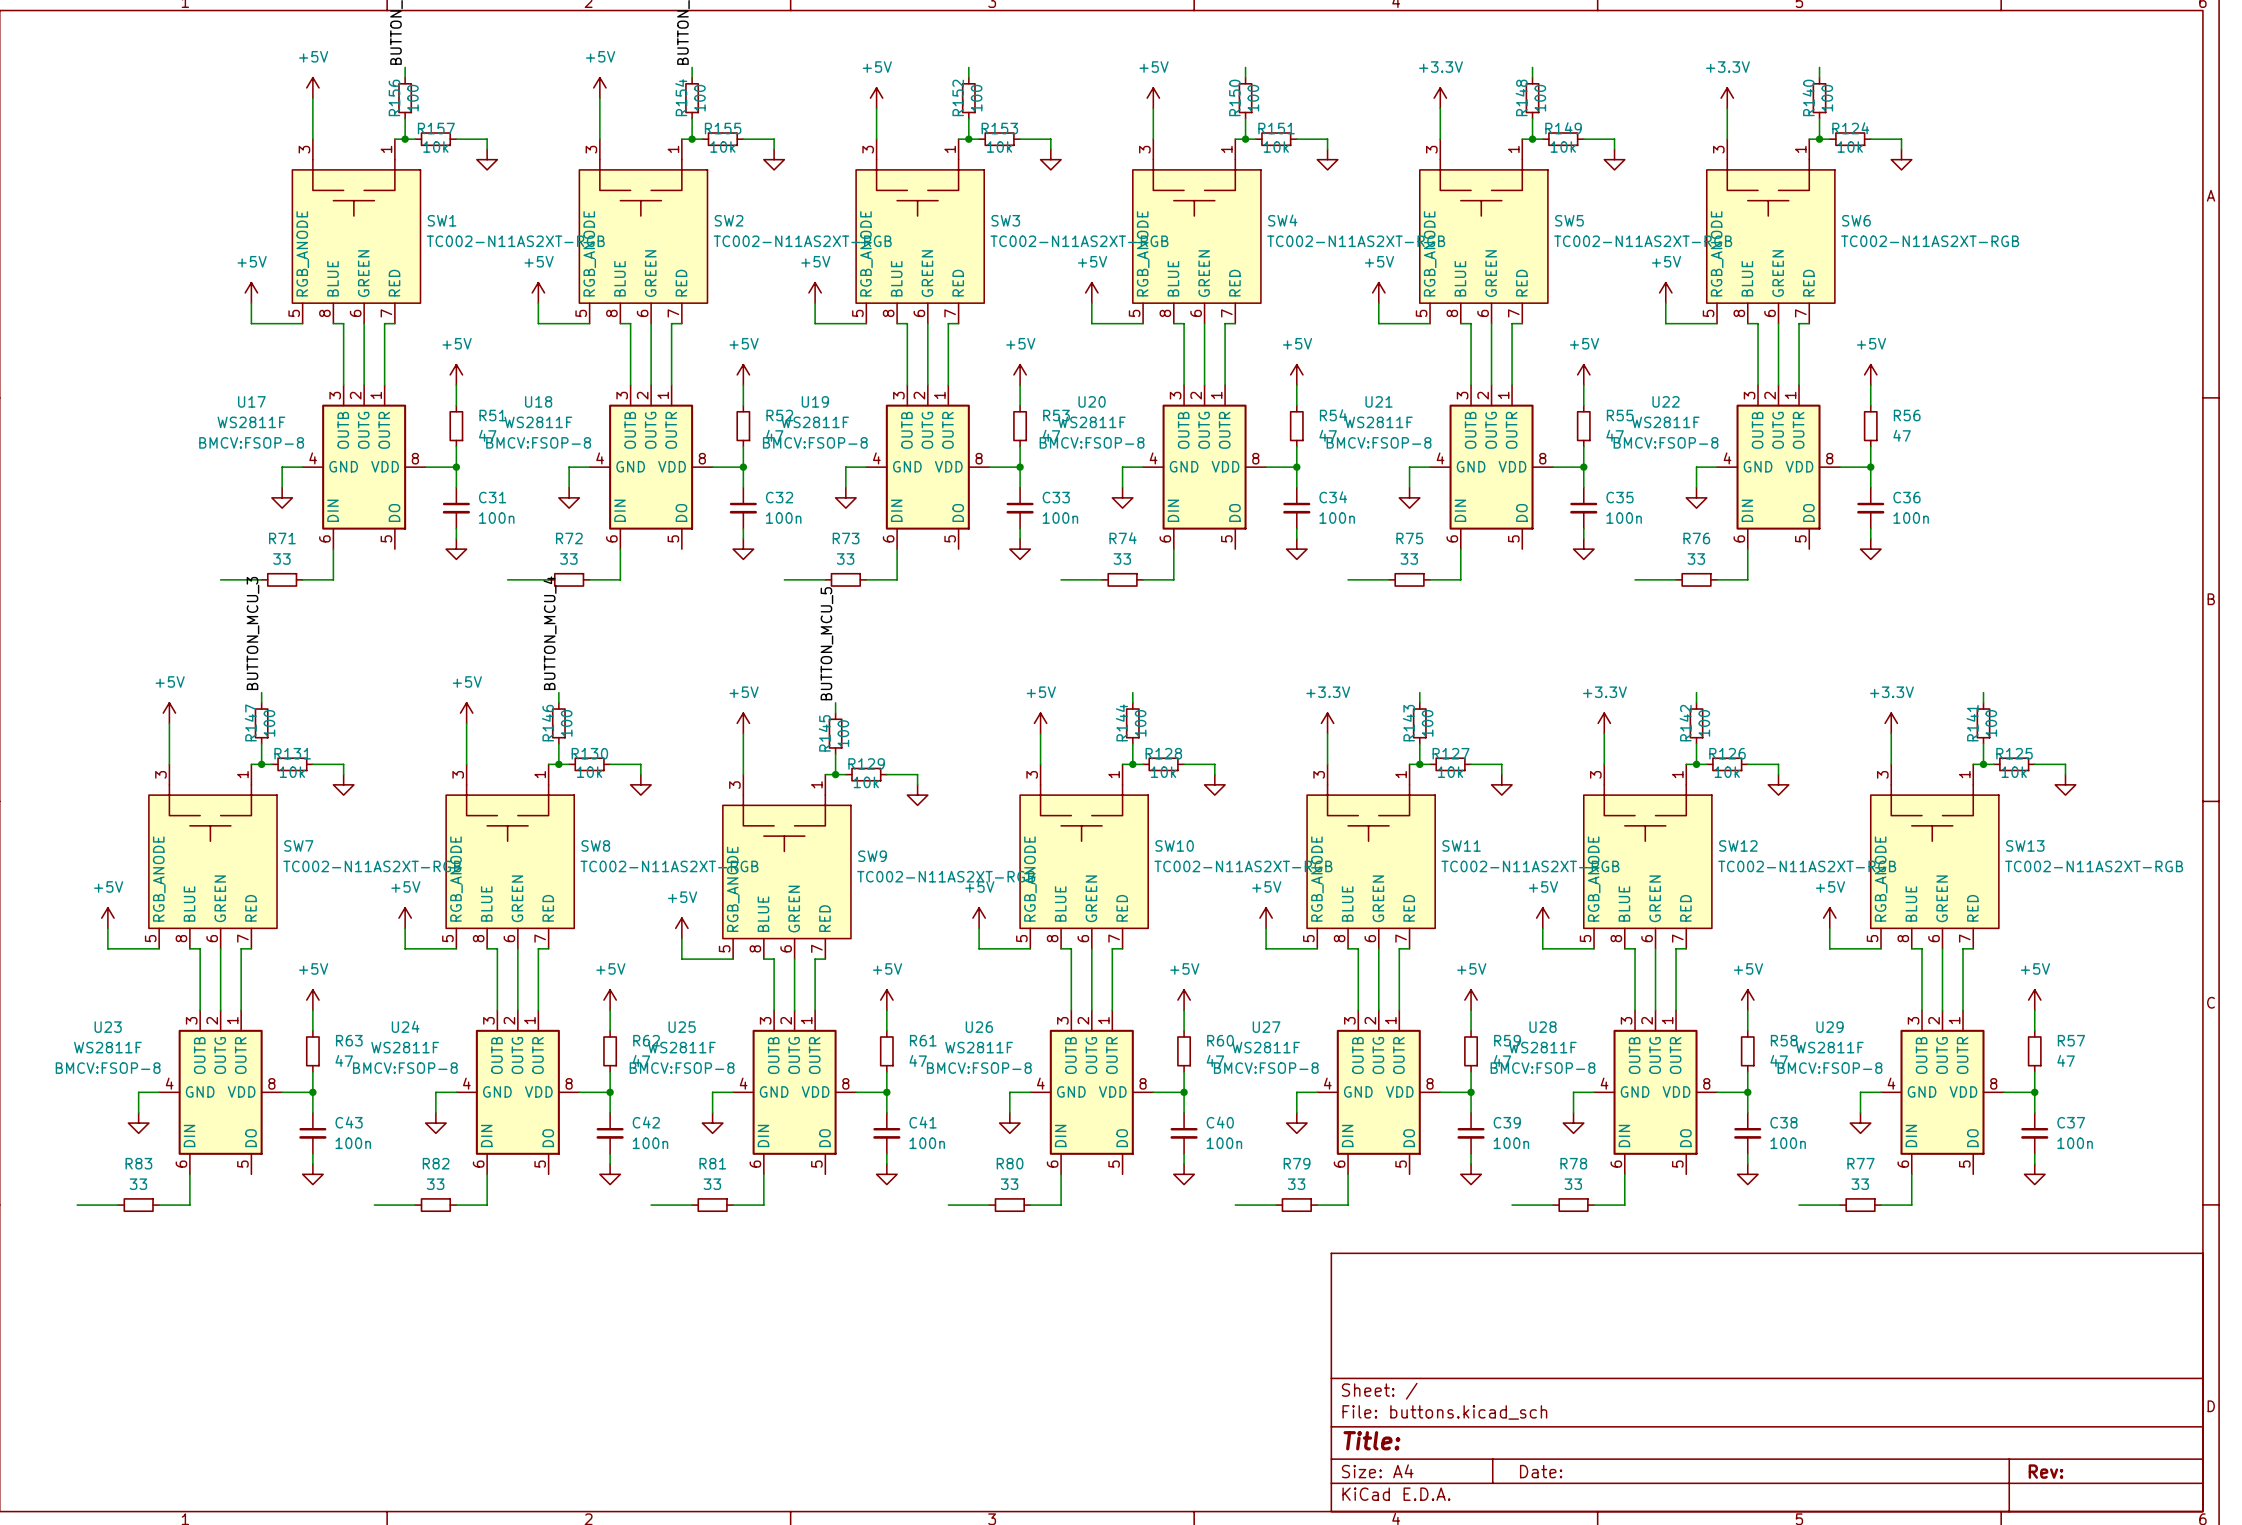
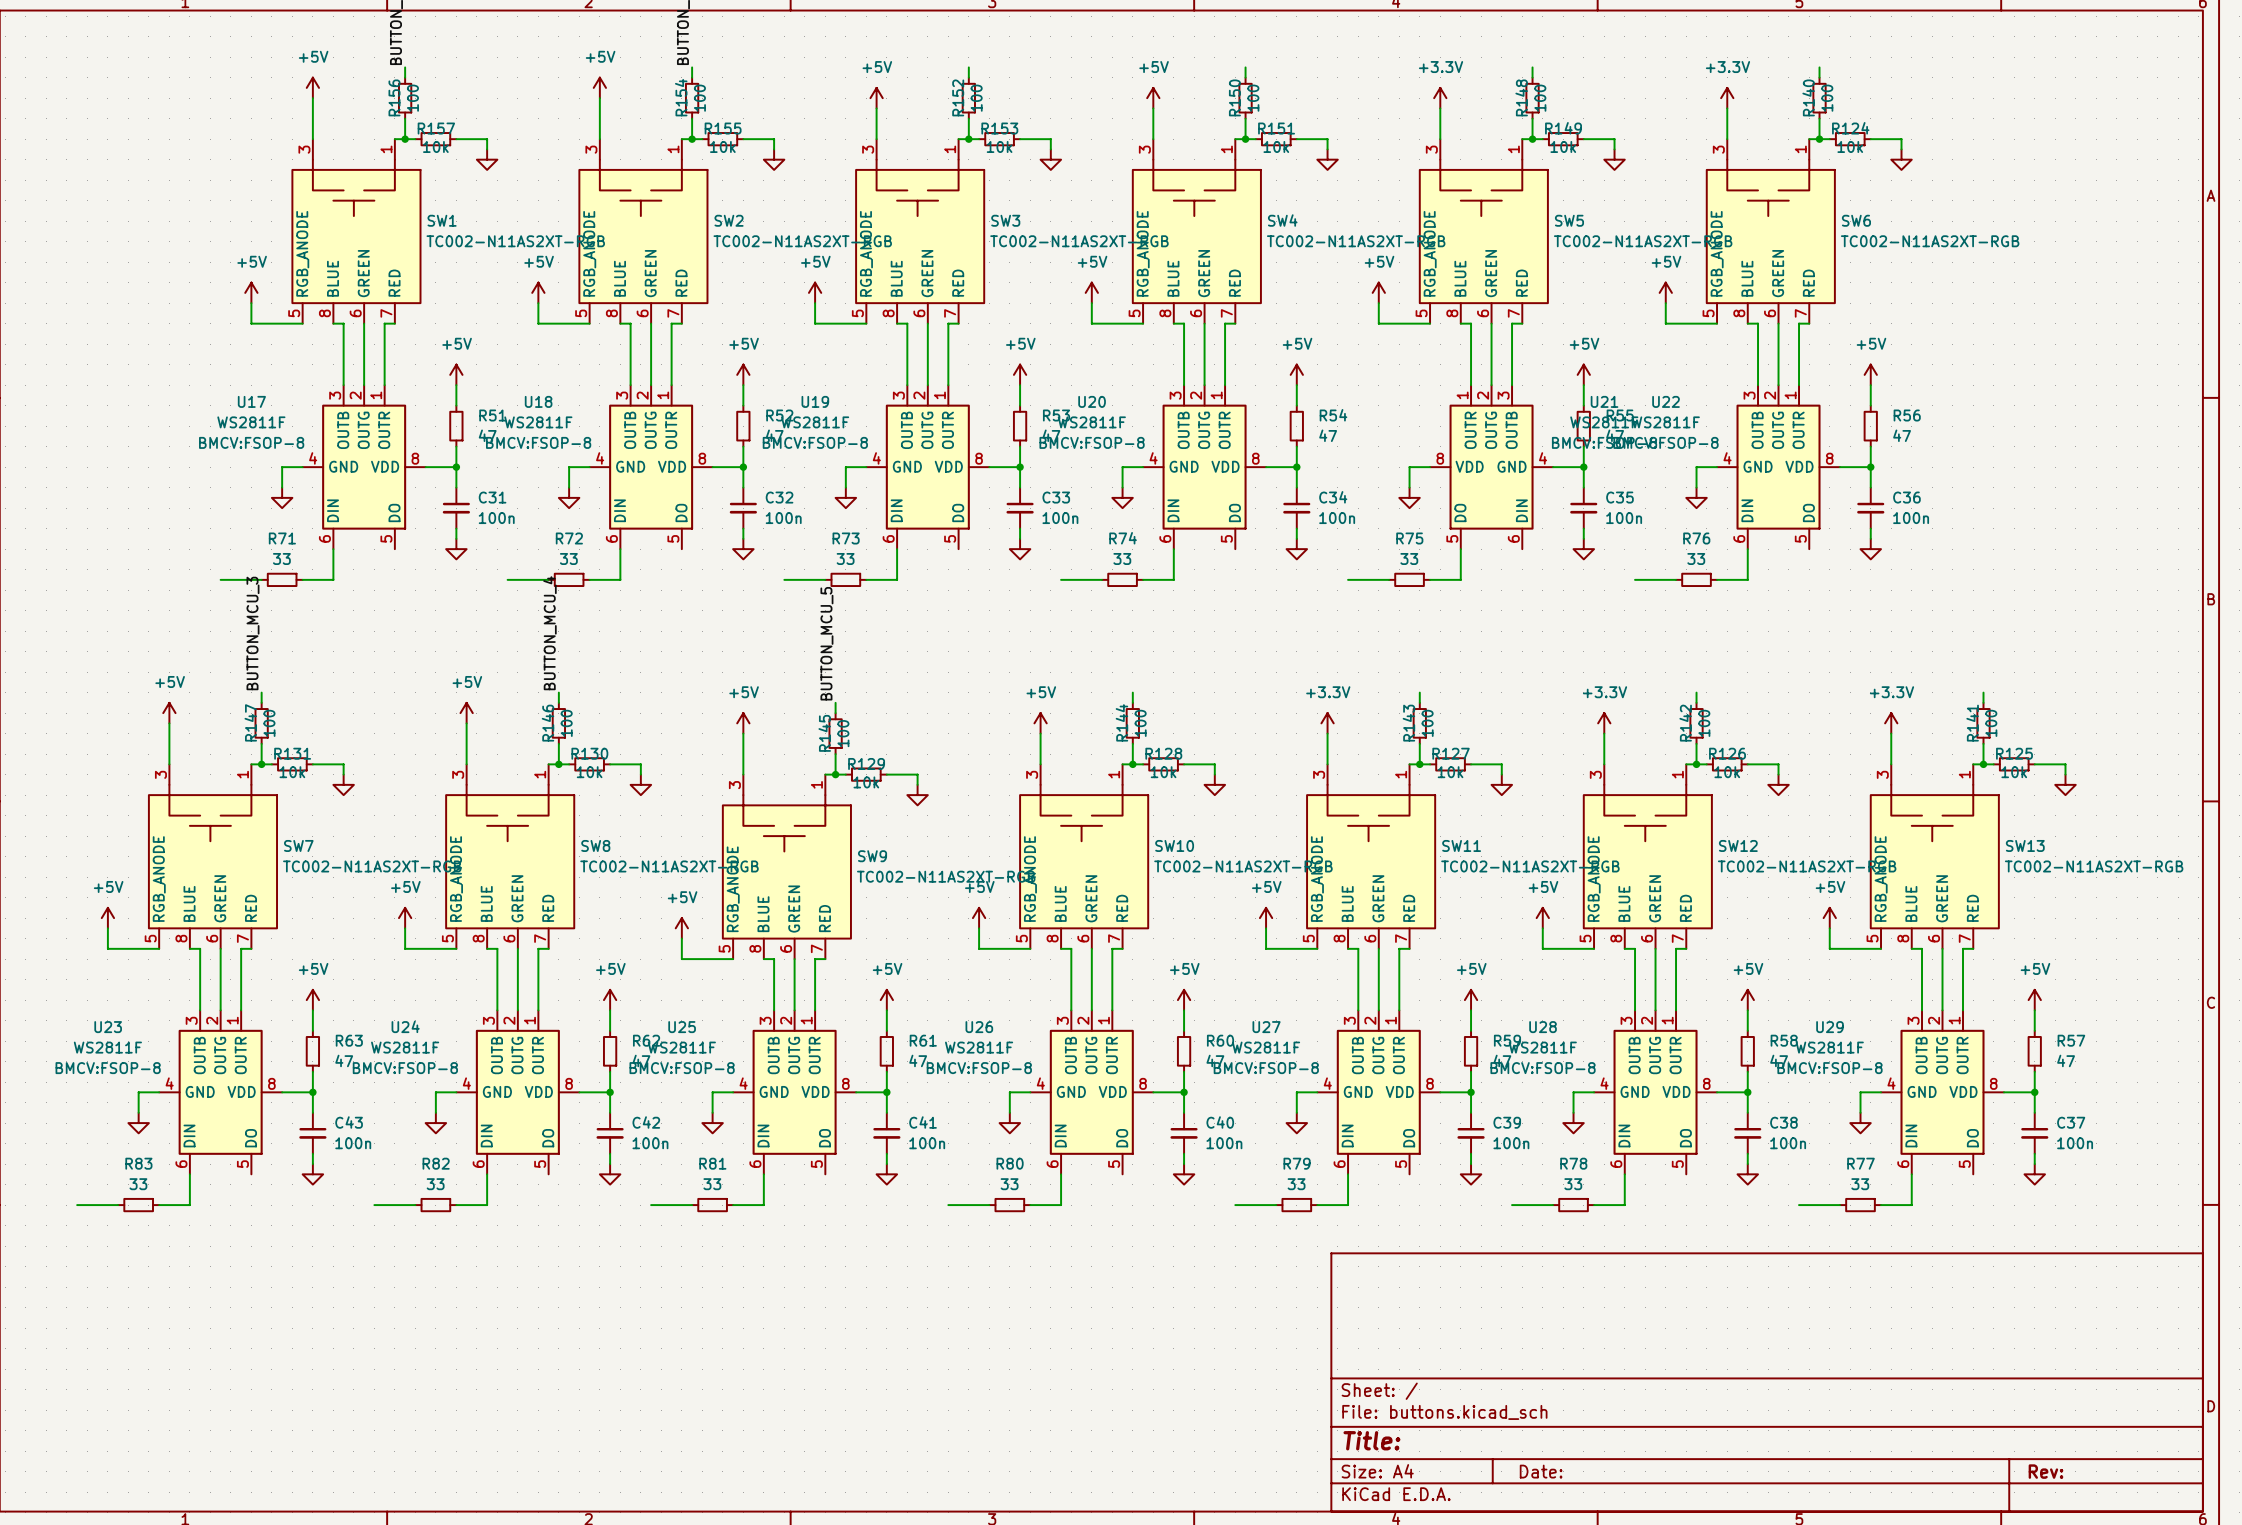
U21 flip: as is (1491, 467) -> left-right (1491, 467)

